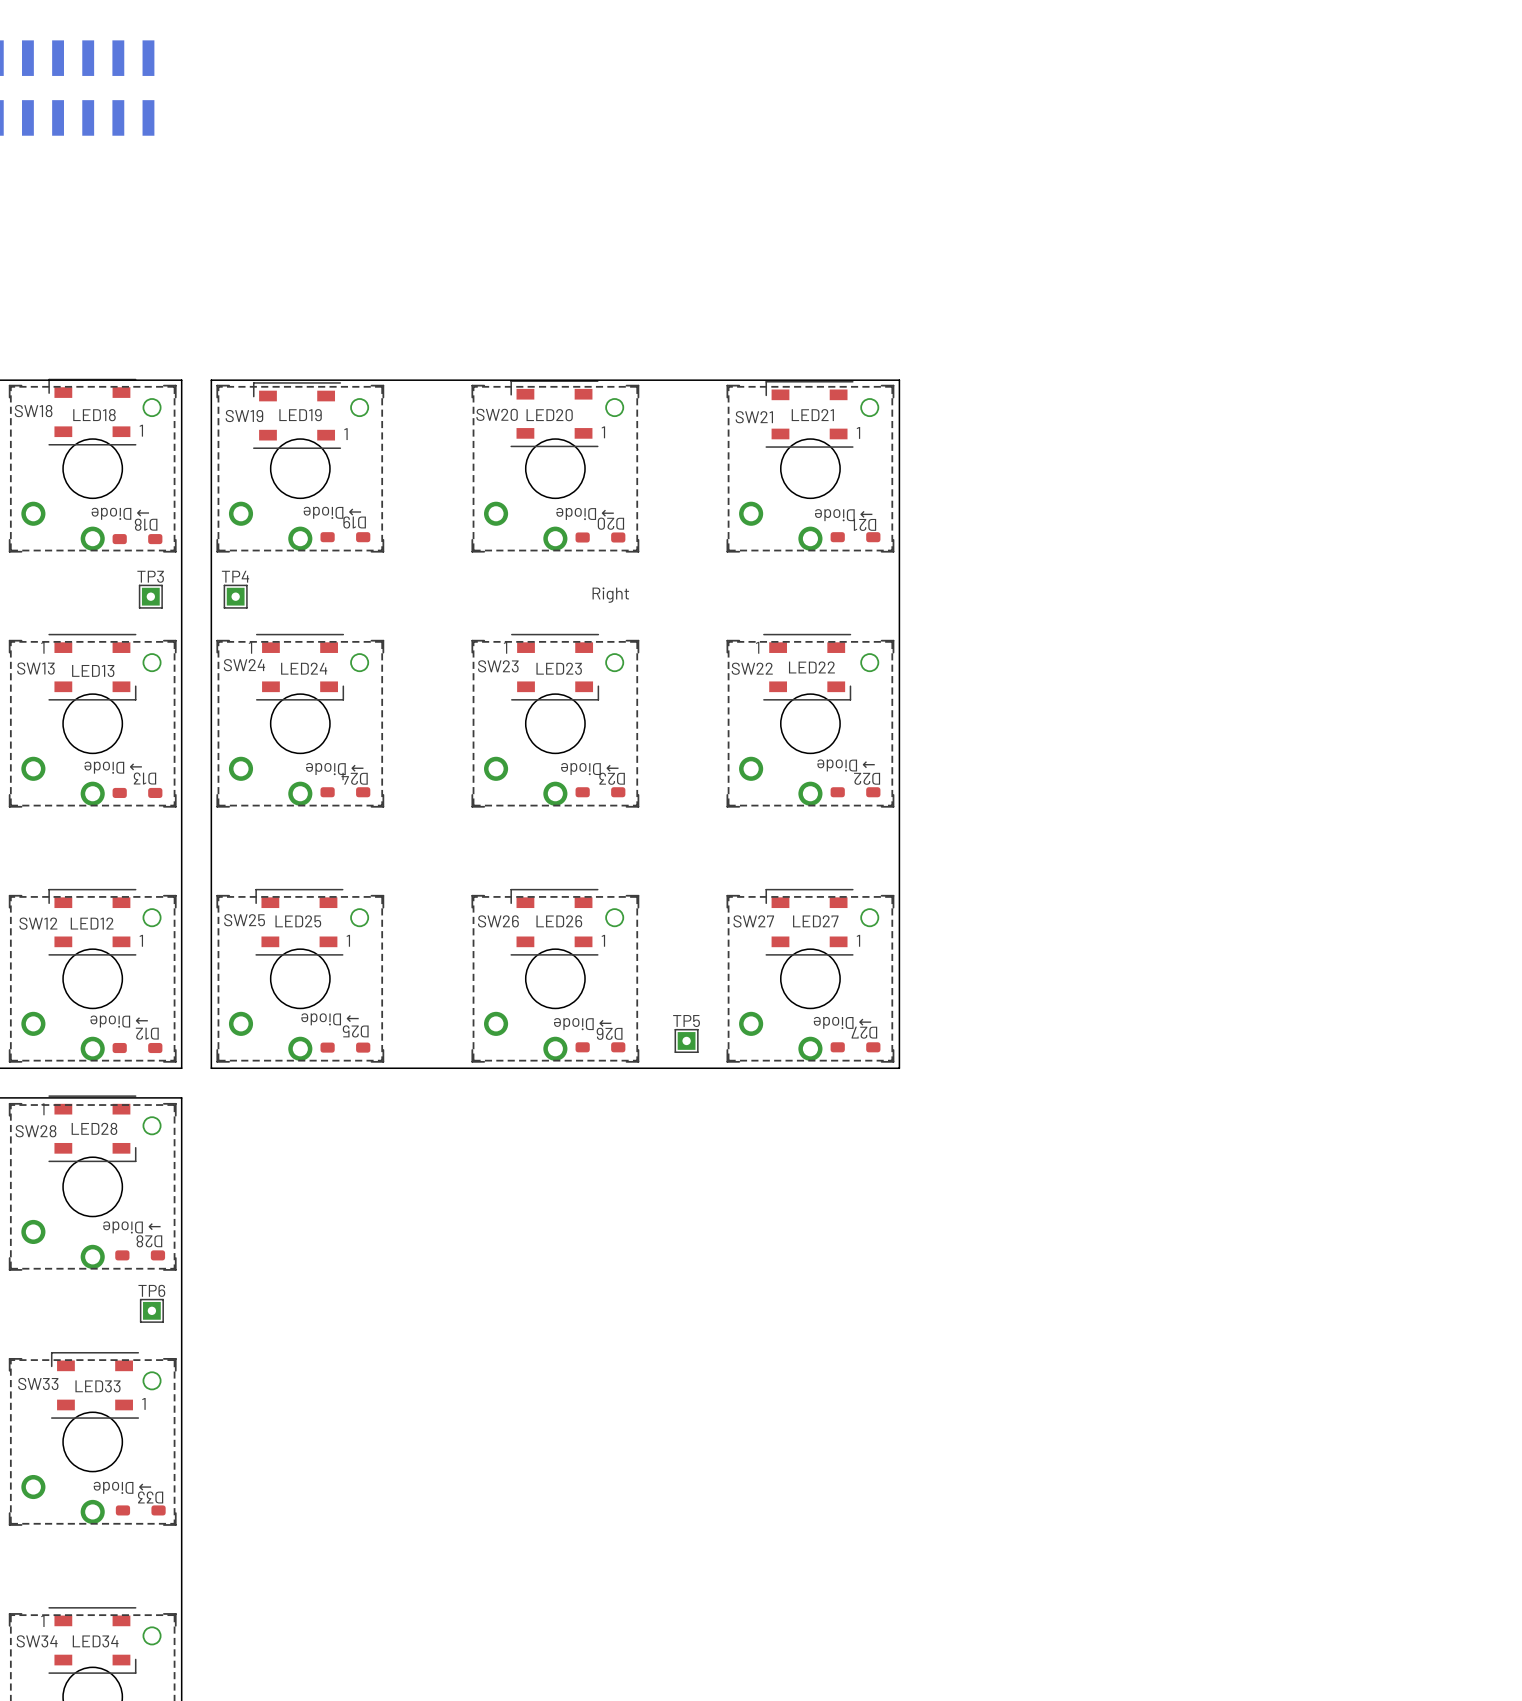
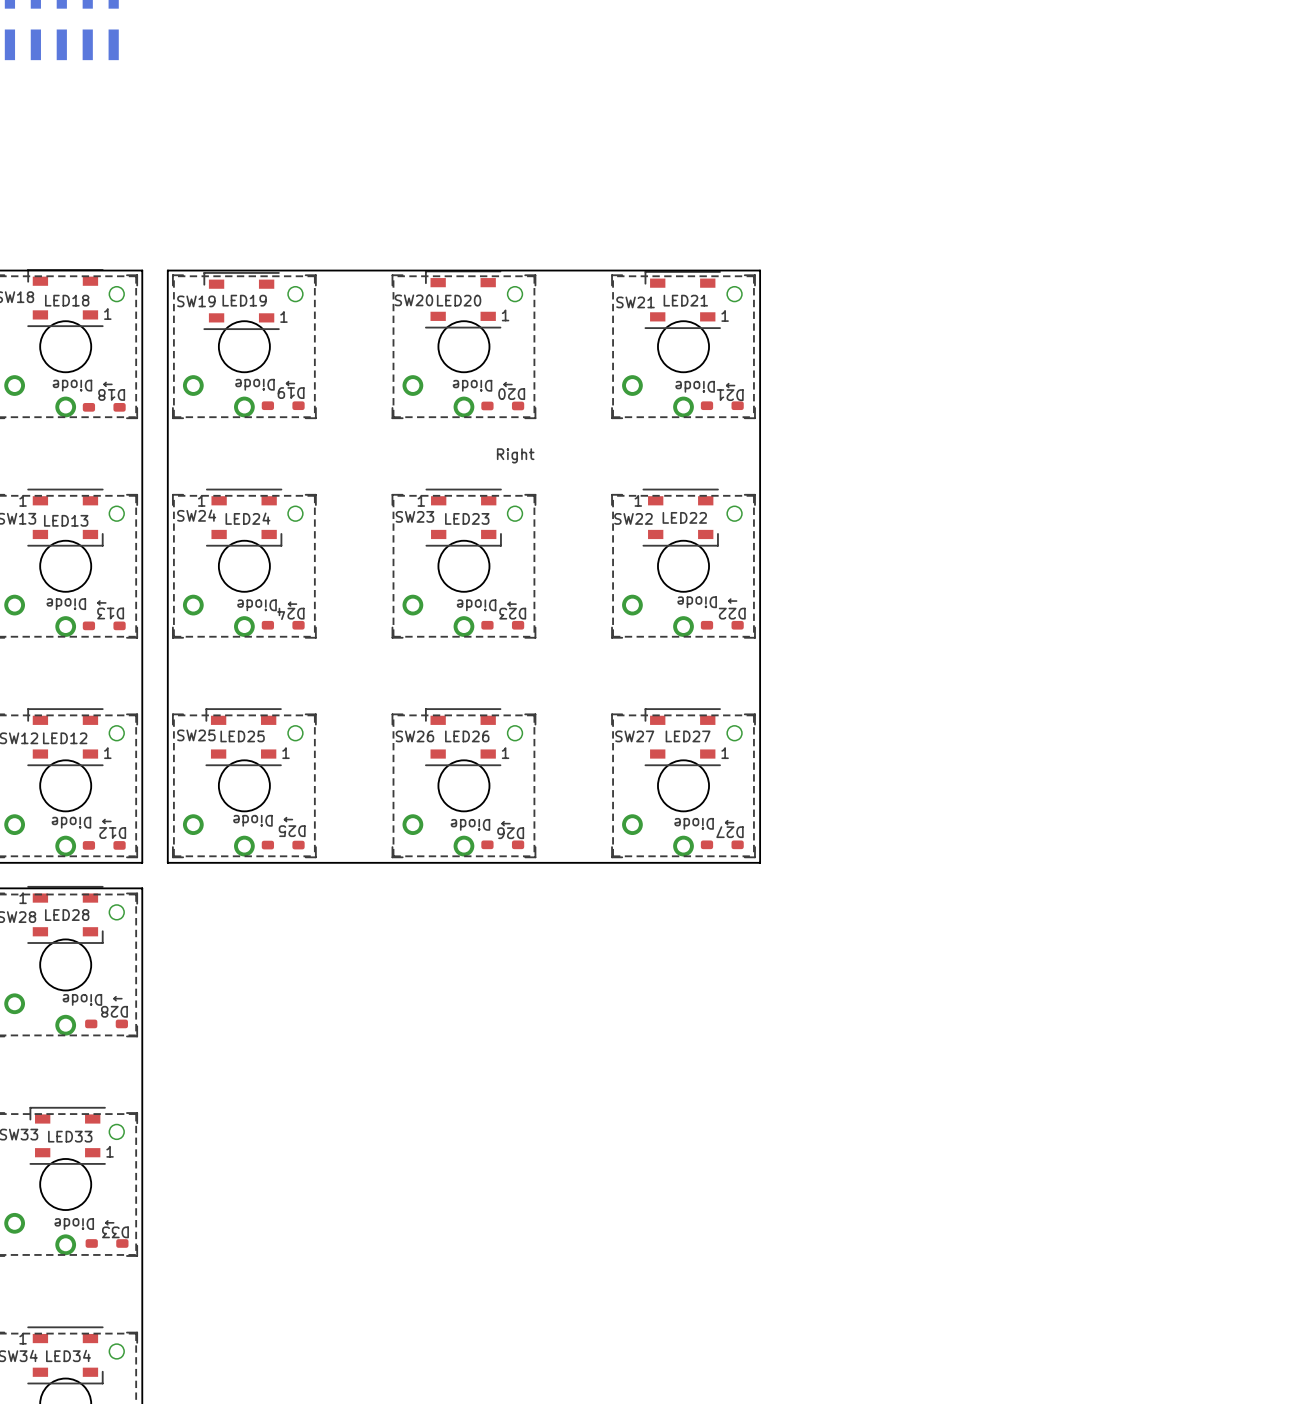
TP3: (150, 596) -> none
TP4: (235, 596) -> none
TP5: (686, 1040) -> none
TP6: (151, 1310) -> none

